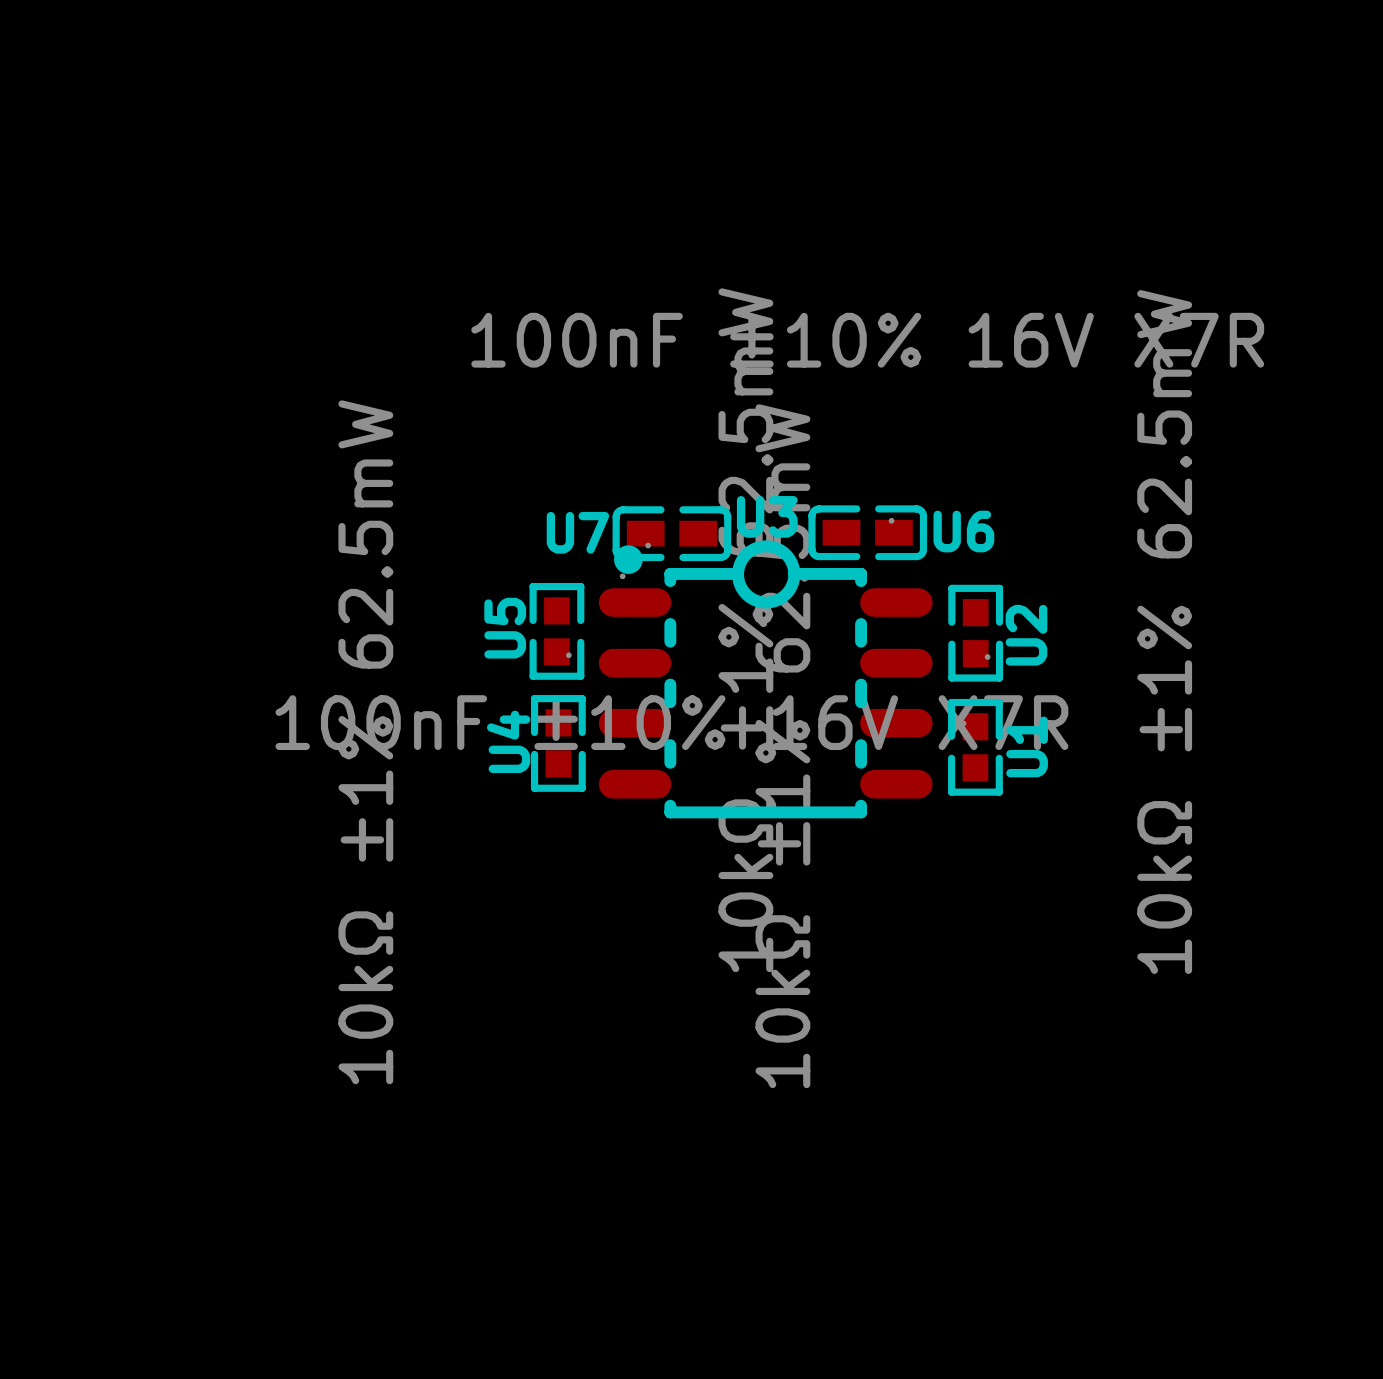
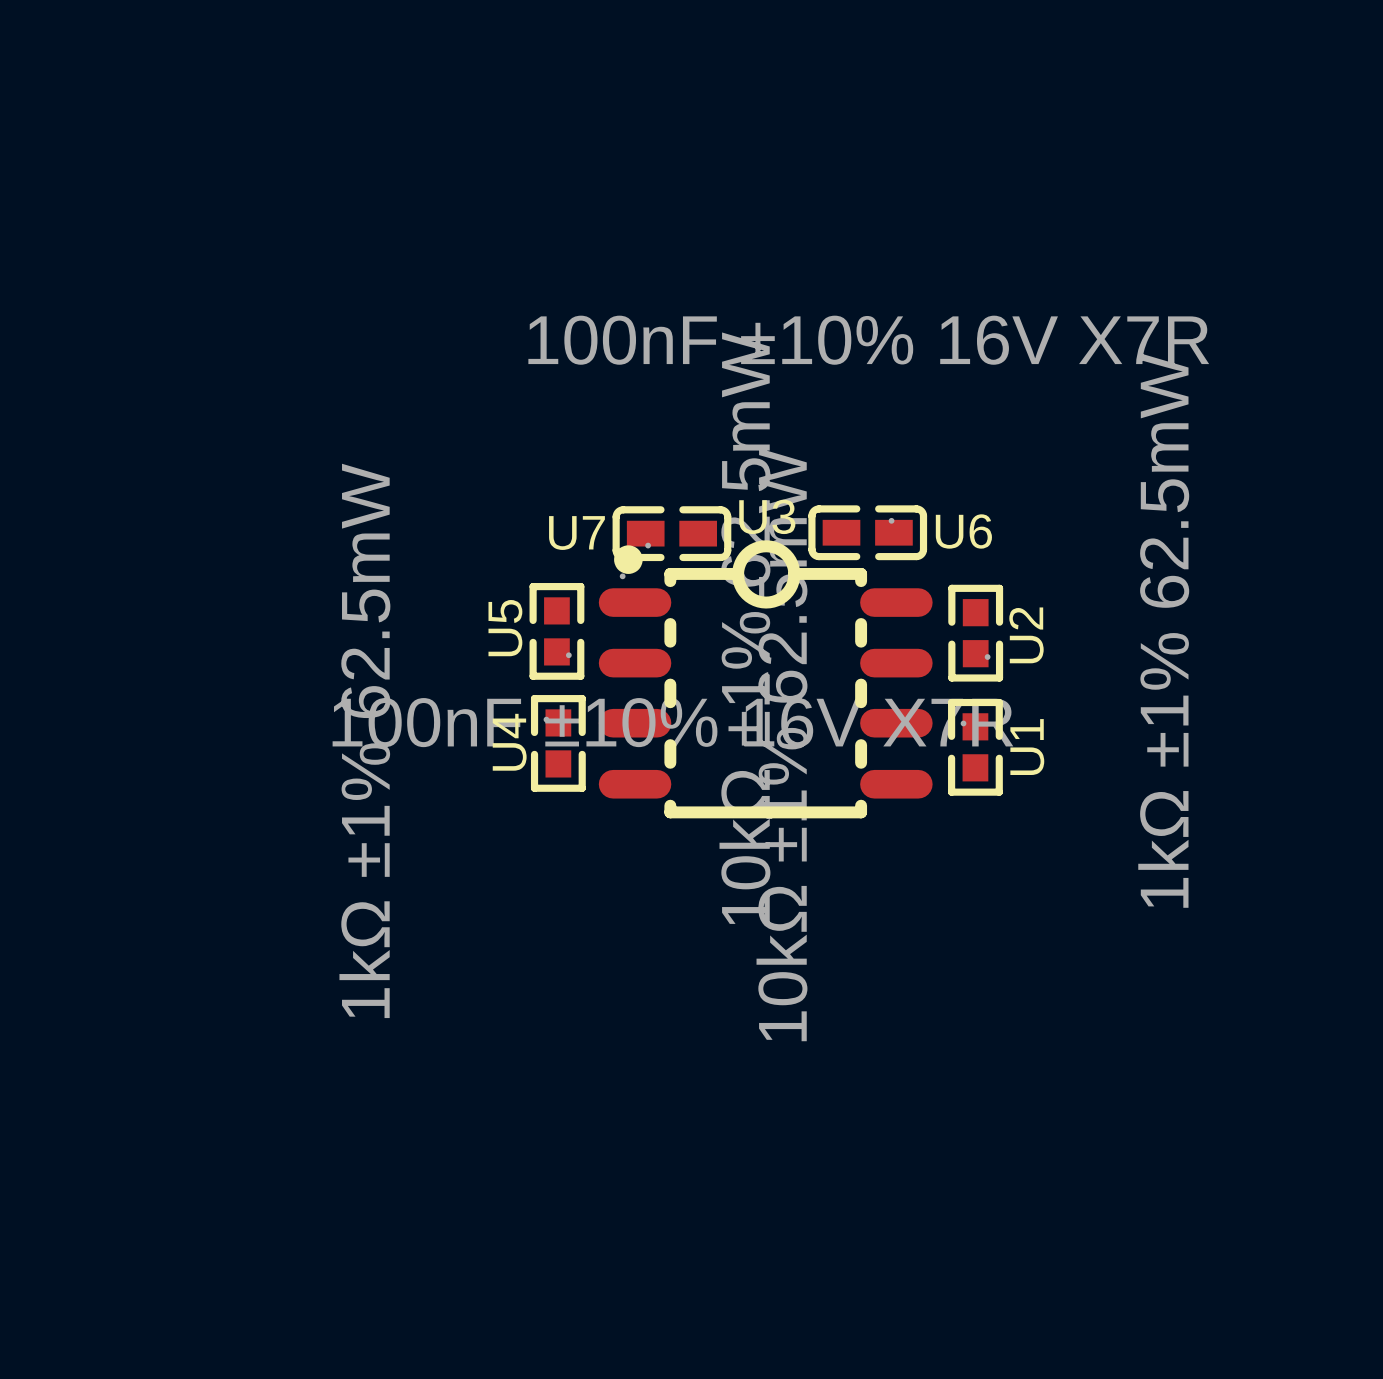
U2 value: 10kΩ ±1% 62.5mW (1164, 632) -> 1kΩ ±1% 62.5mW (1163, 630)
U4 value: 10kΩ ±1% 62.5mW (365, 742) -> 1kΩ ±1% 62.5mW (364, 740)

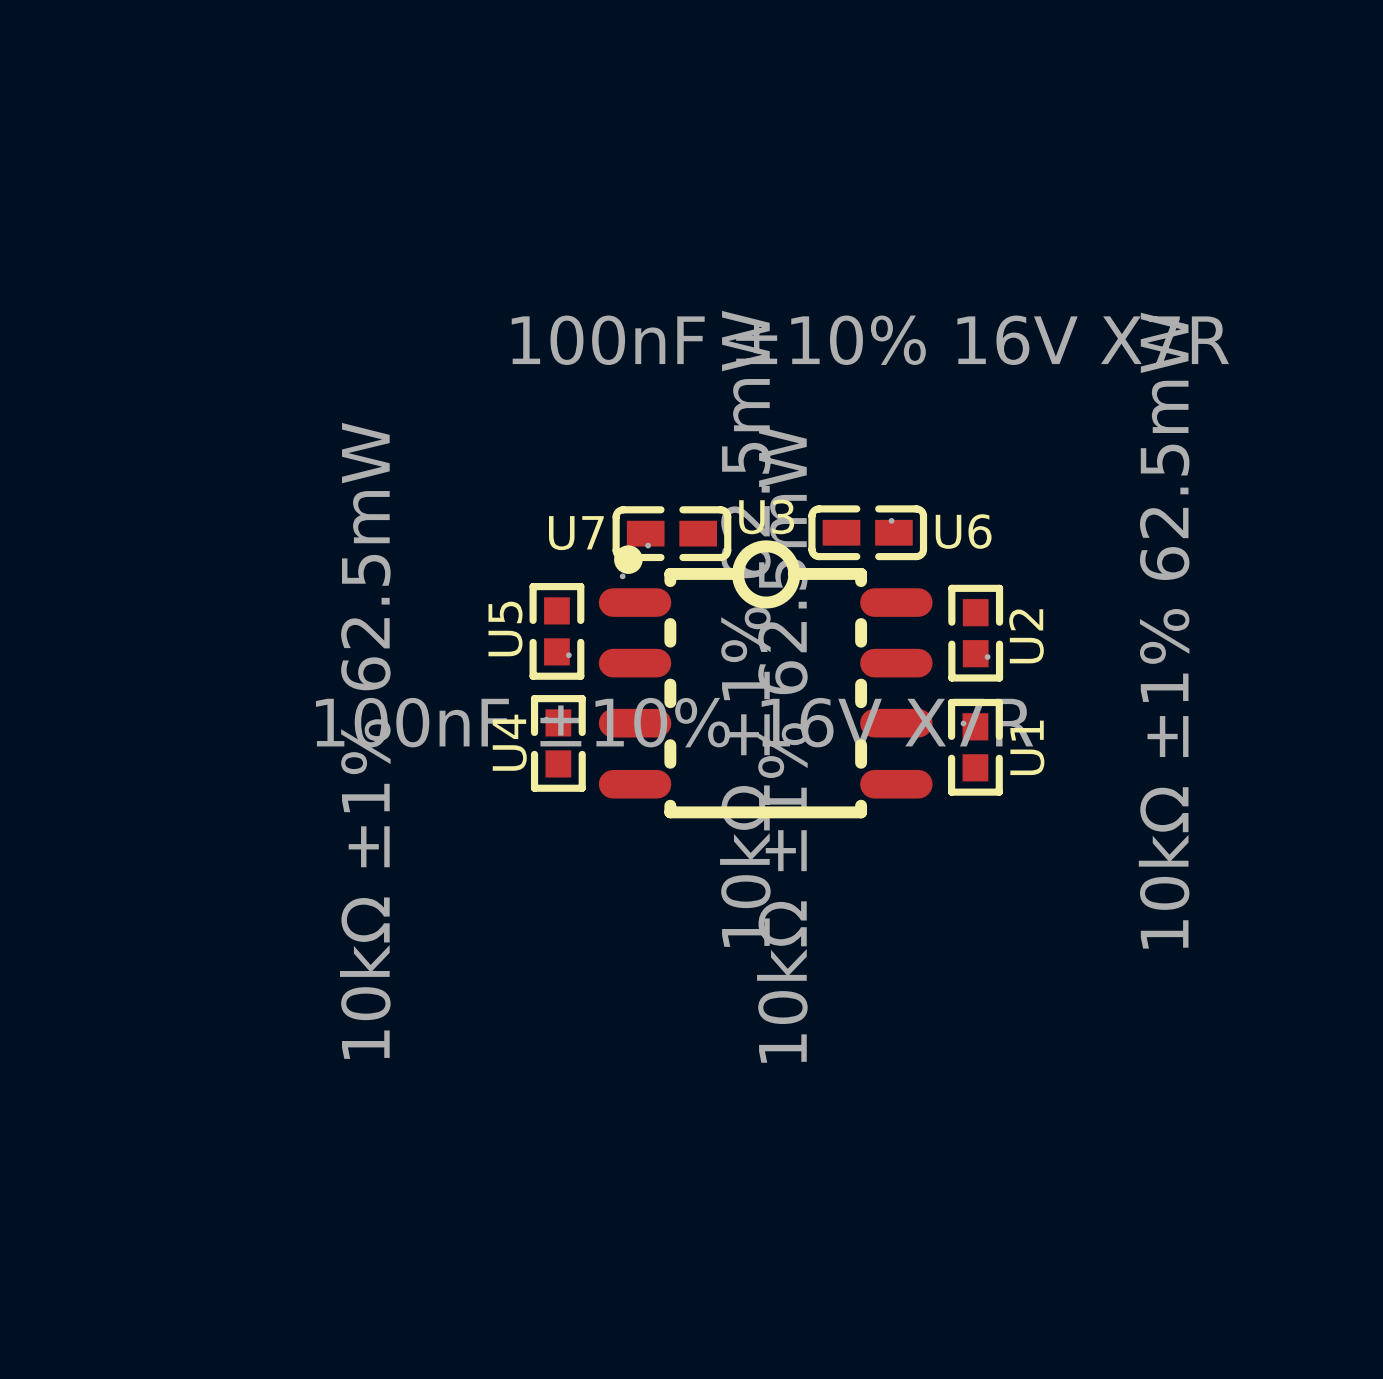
U2 value: 1kΩ ±1% 62.5mW (1163, 630) -> 10kΩ ±1% 62.5mW (1164, 630)
U4 value: 1kΩ ±1% 62.5mW (364, 740) -> 10kΩ ±1% 62.5mW (365, 740)

